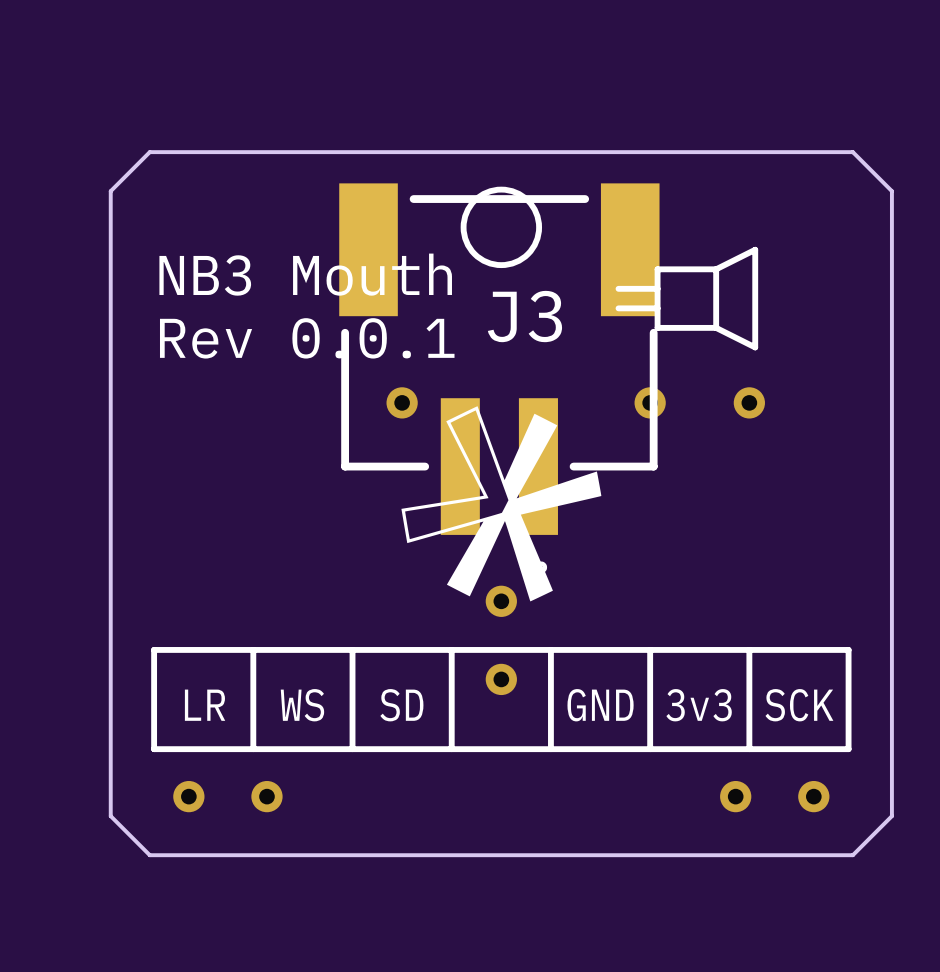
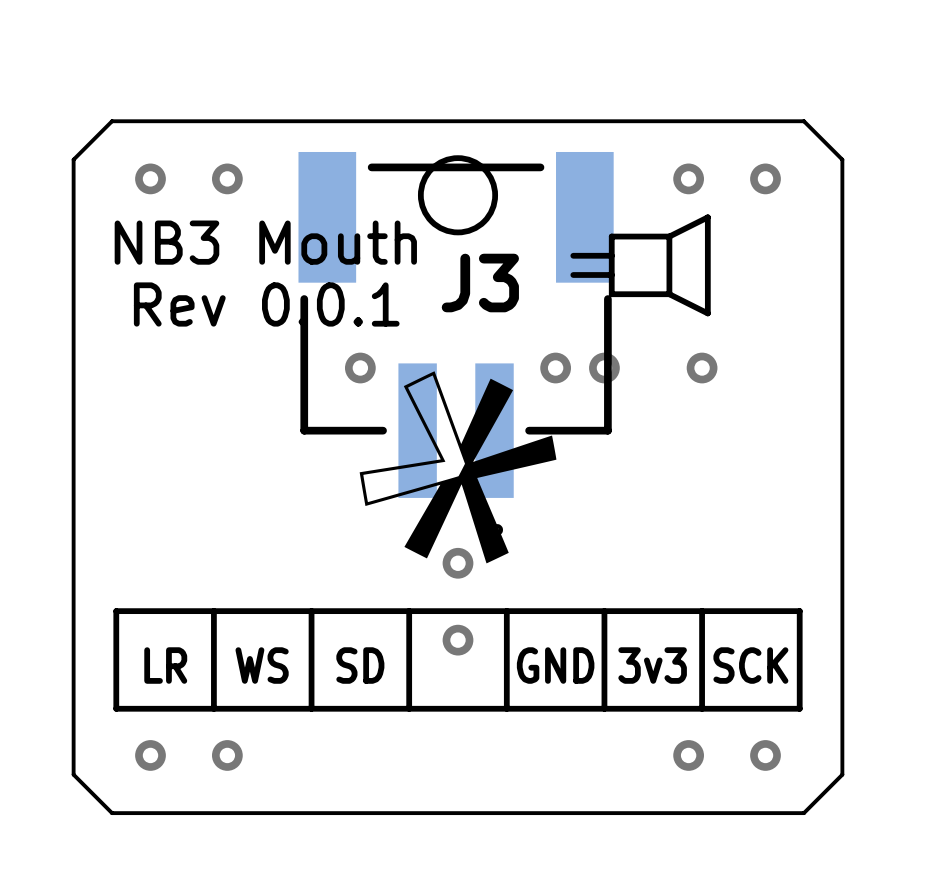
via: none -> (150, 178)
via: none -> (227, 178)
via: none -> (688, 178)
via: none -> (765, 178)
via: none -> (555, 368)

